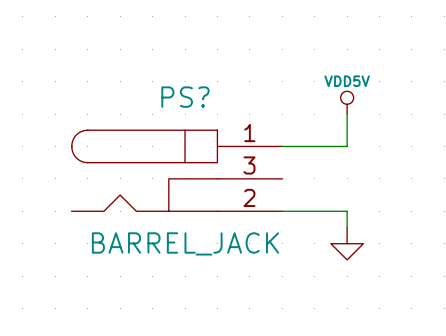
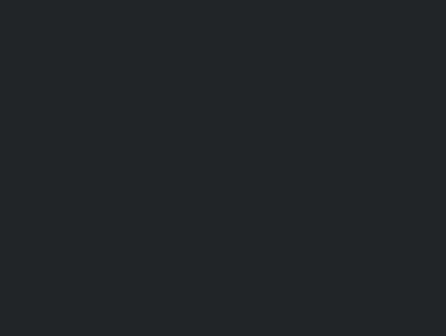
power symbol: VDD5V (347, 102) -> none
wire: (347, 114) (347, 146) (282, 146) -> none
PS?: BARREL_JACK (176, 170) -> none
wire: (282, 211) (347, 211) (347, 227) -> none
power symbol: (347, 243) -> none

